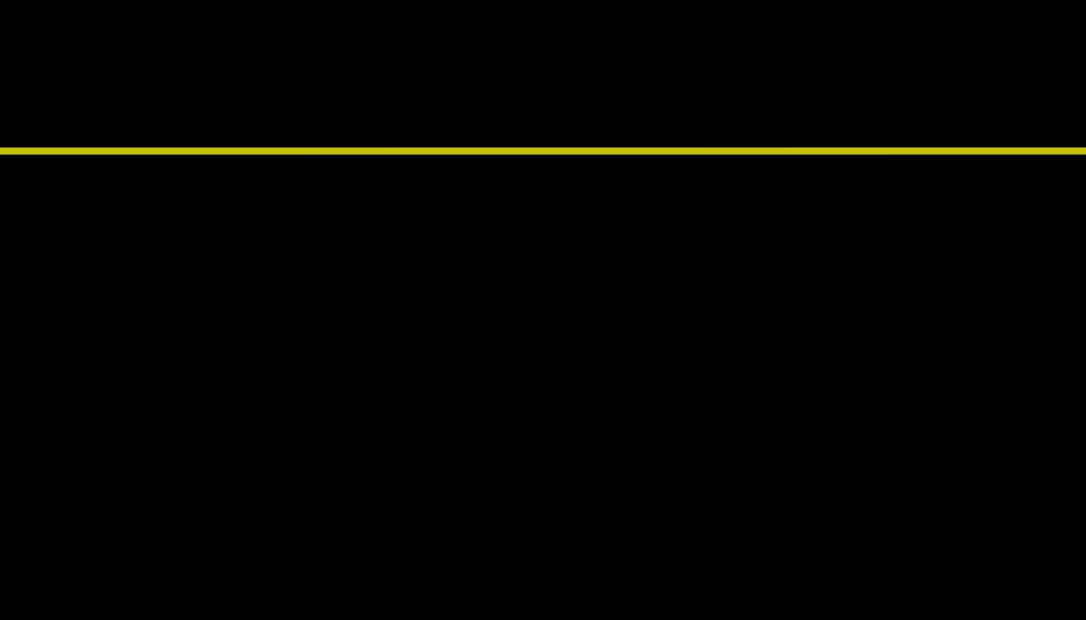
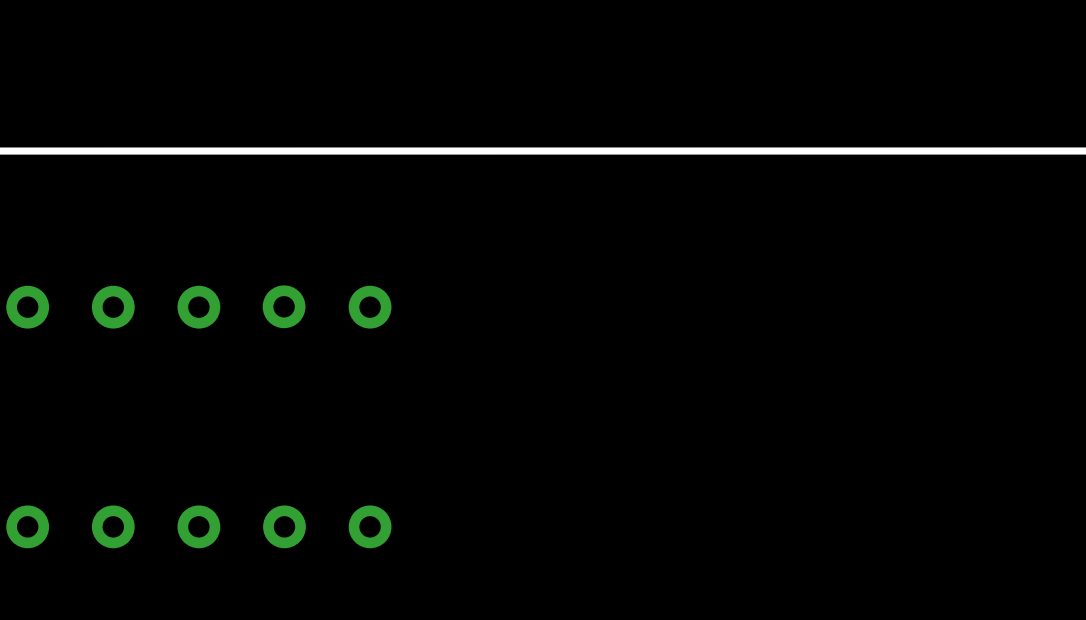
via: none -> (284, 306)
via: none -> (27, 307)
via: none -> (113, 307)
via: none -> (198, 307)
via: none -> (370, 307)
via: none -> (27, 526)
via: none -> (113, 526)
via: none -> (198, 526)
via: none -> (284, 526)
via: none -> (370, 526)

